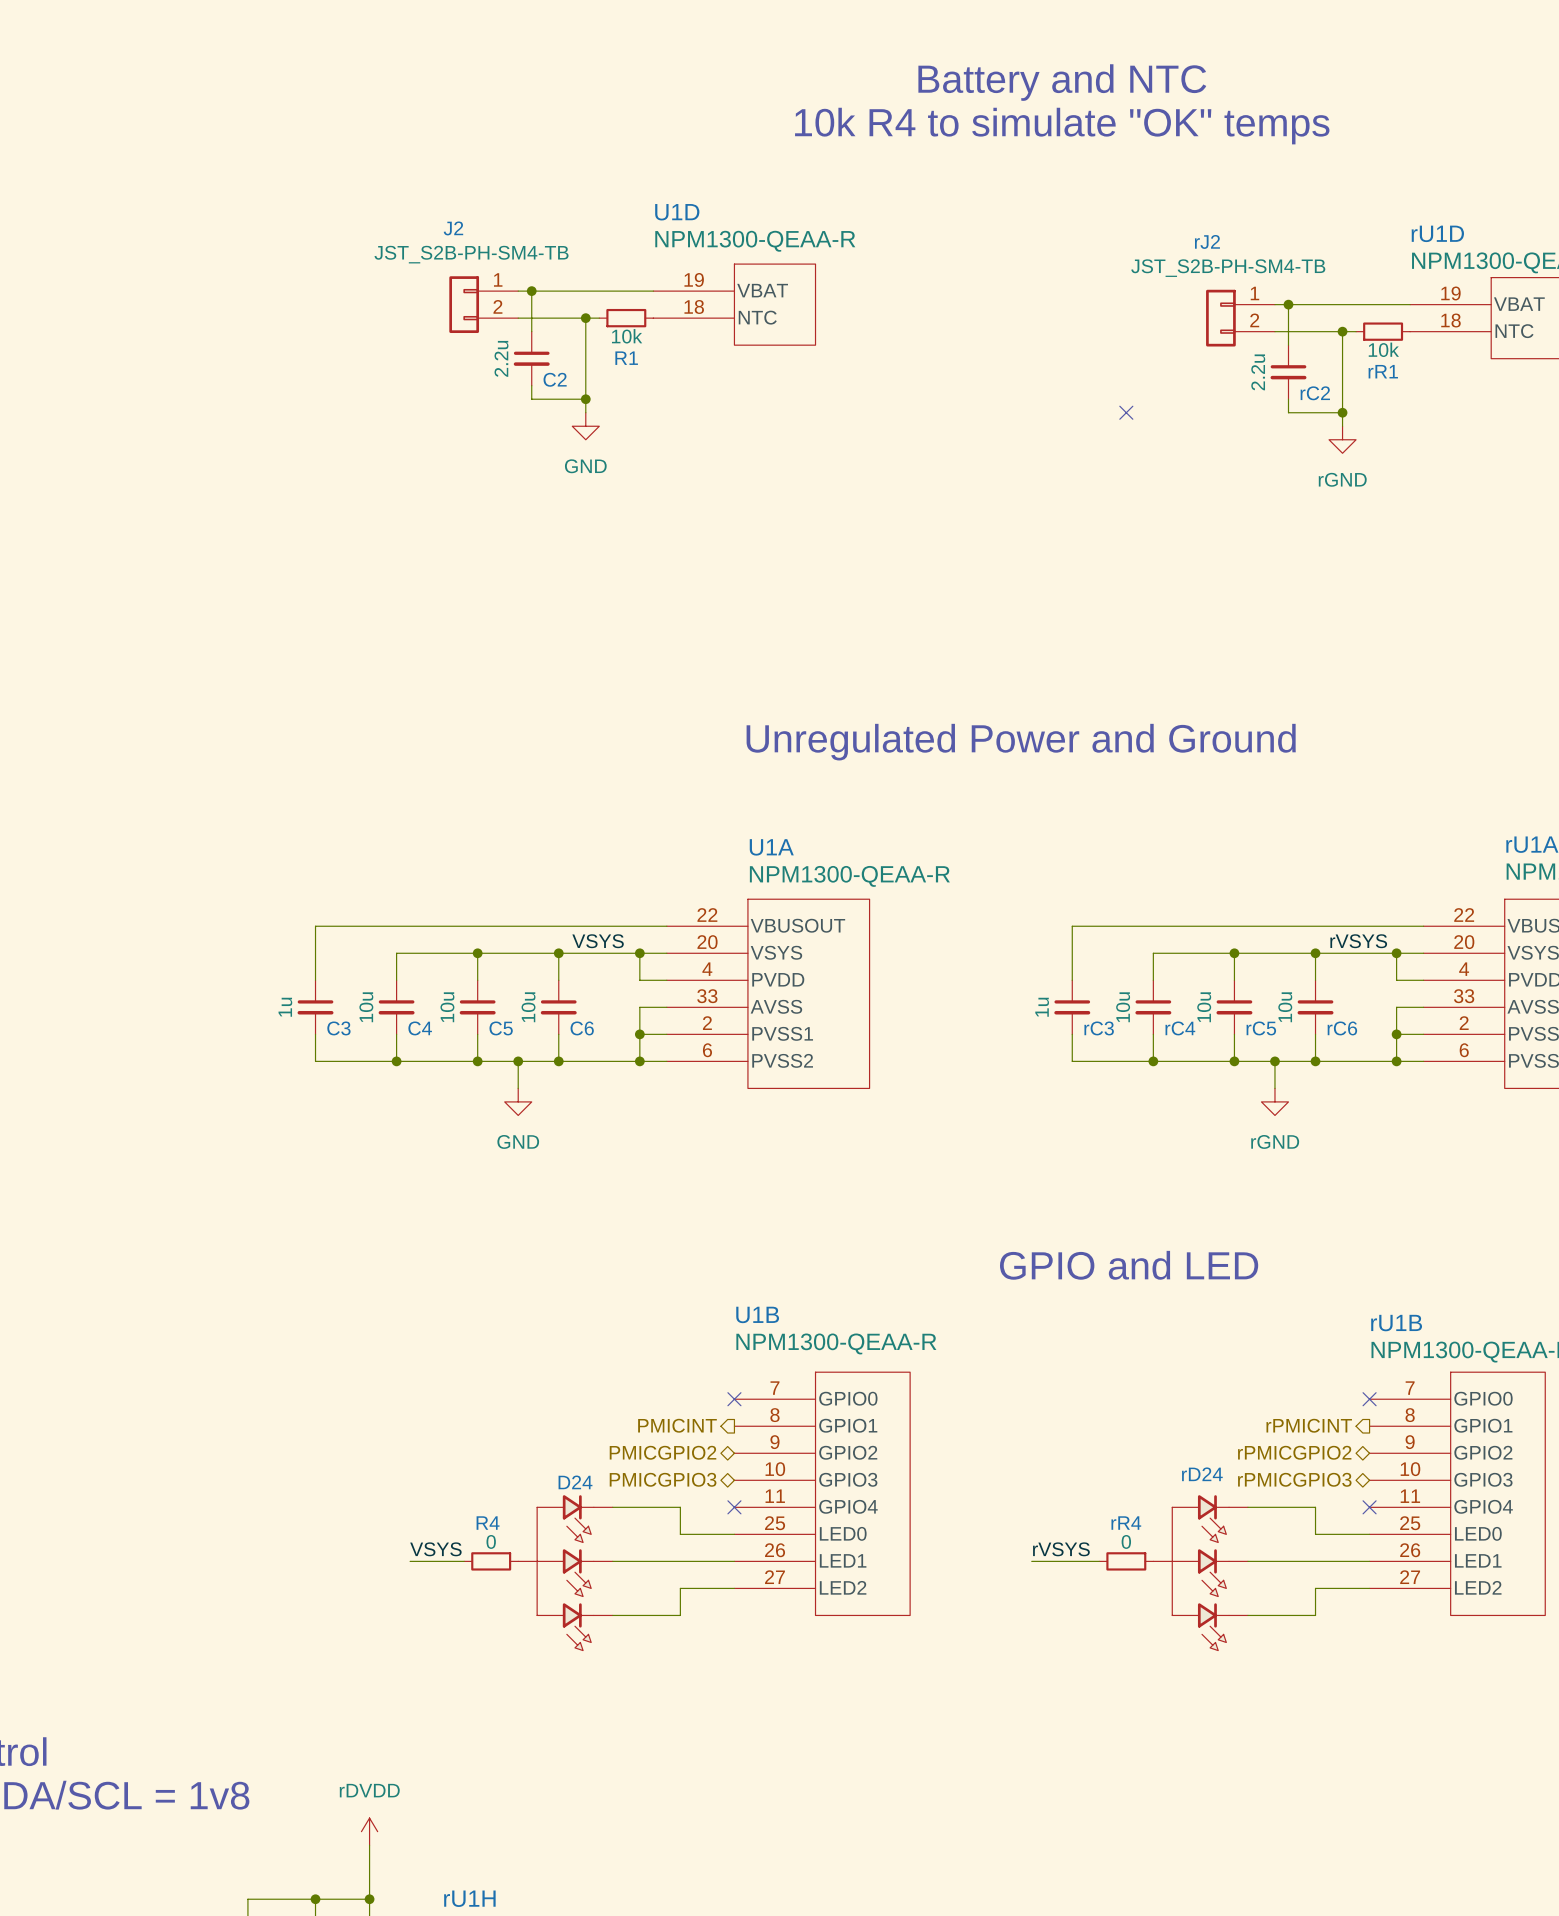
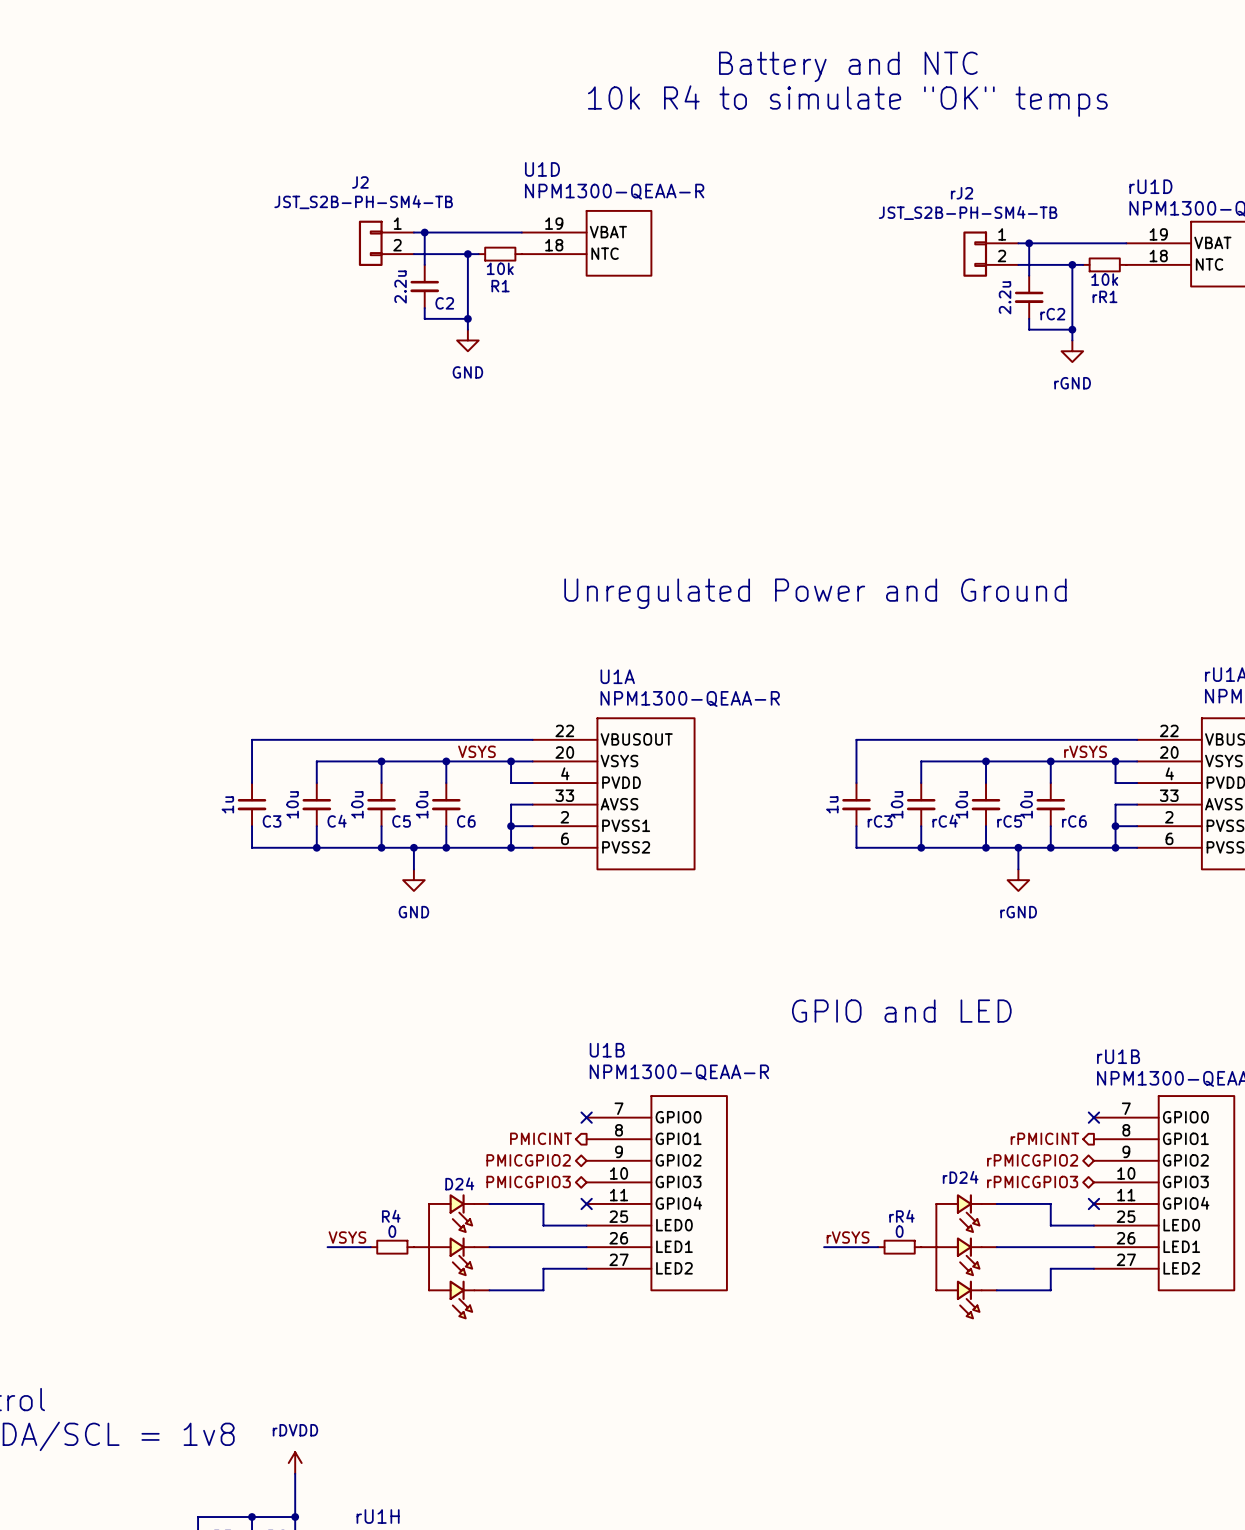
no-connect mark: (1126, 412) -> none

